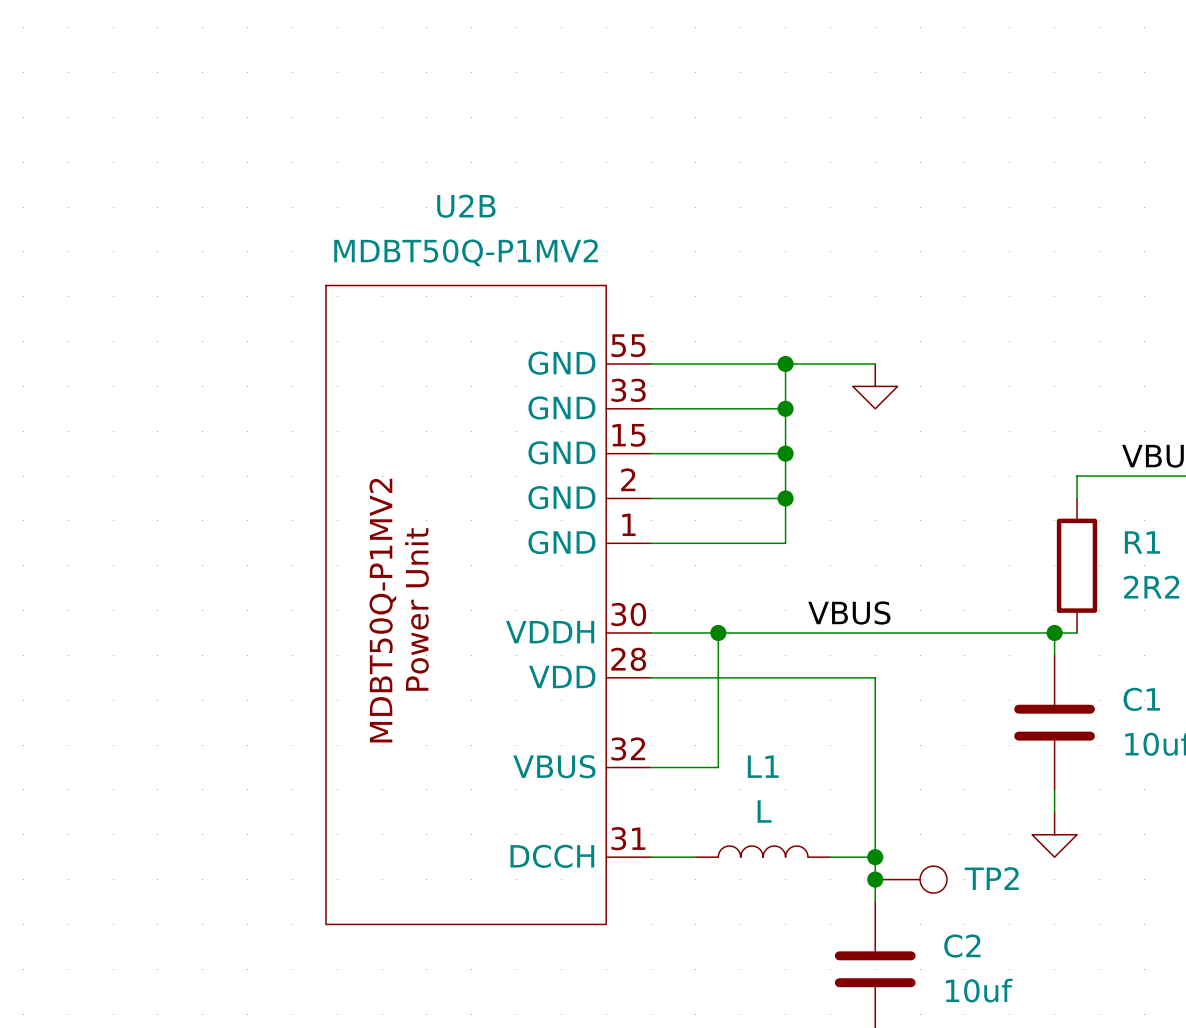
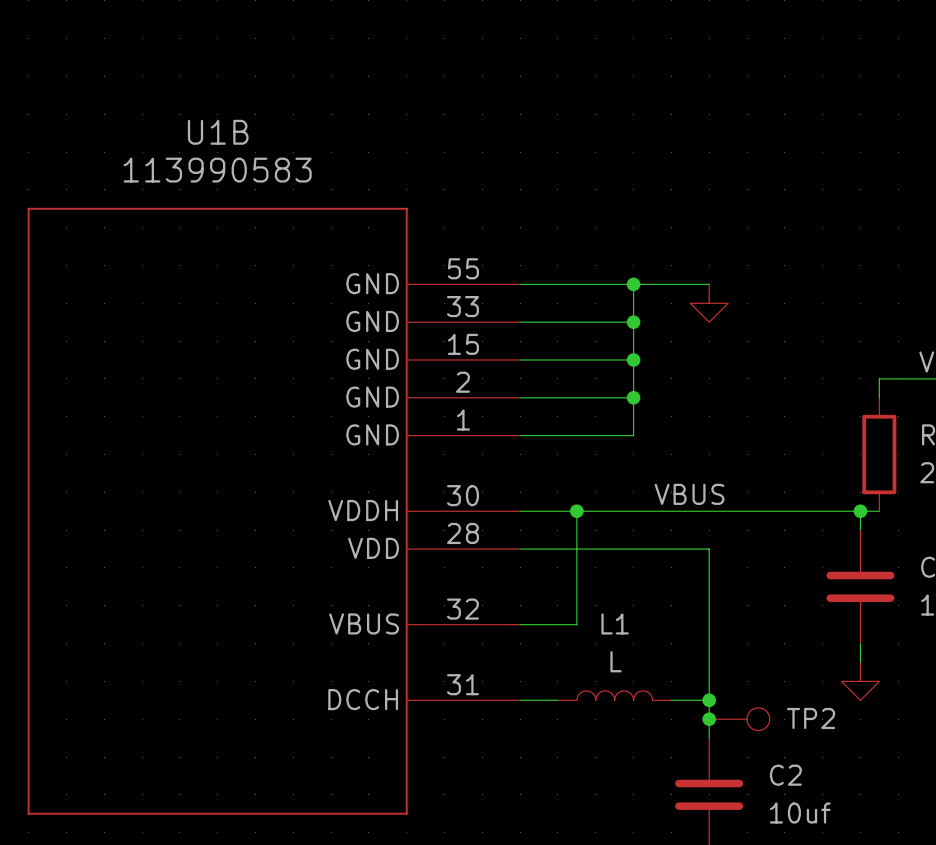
U2B: MDBT50Q-P1MV2 (488, 604) -> none
U1B: none -> 113990583 (273, 511)

